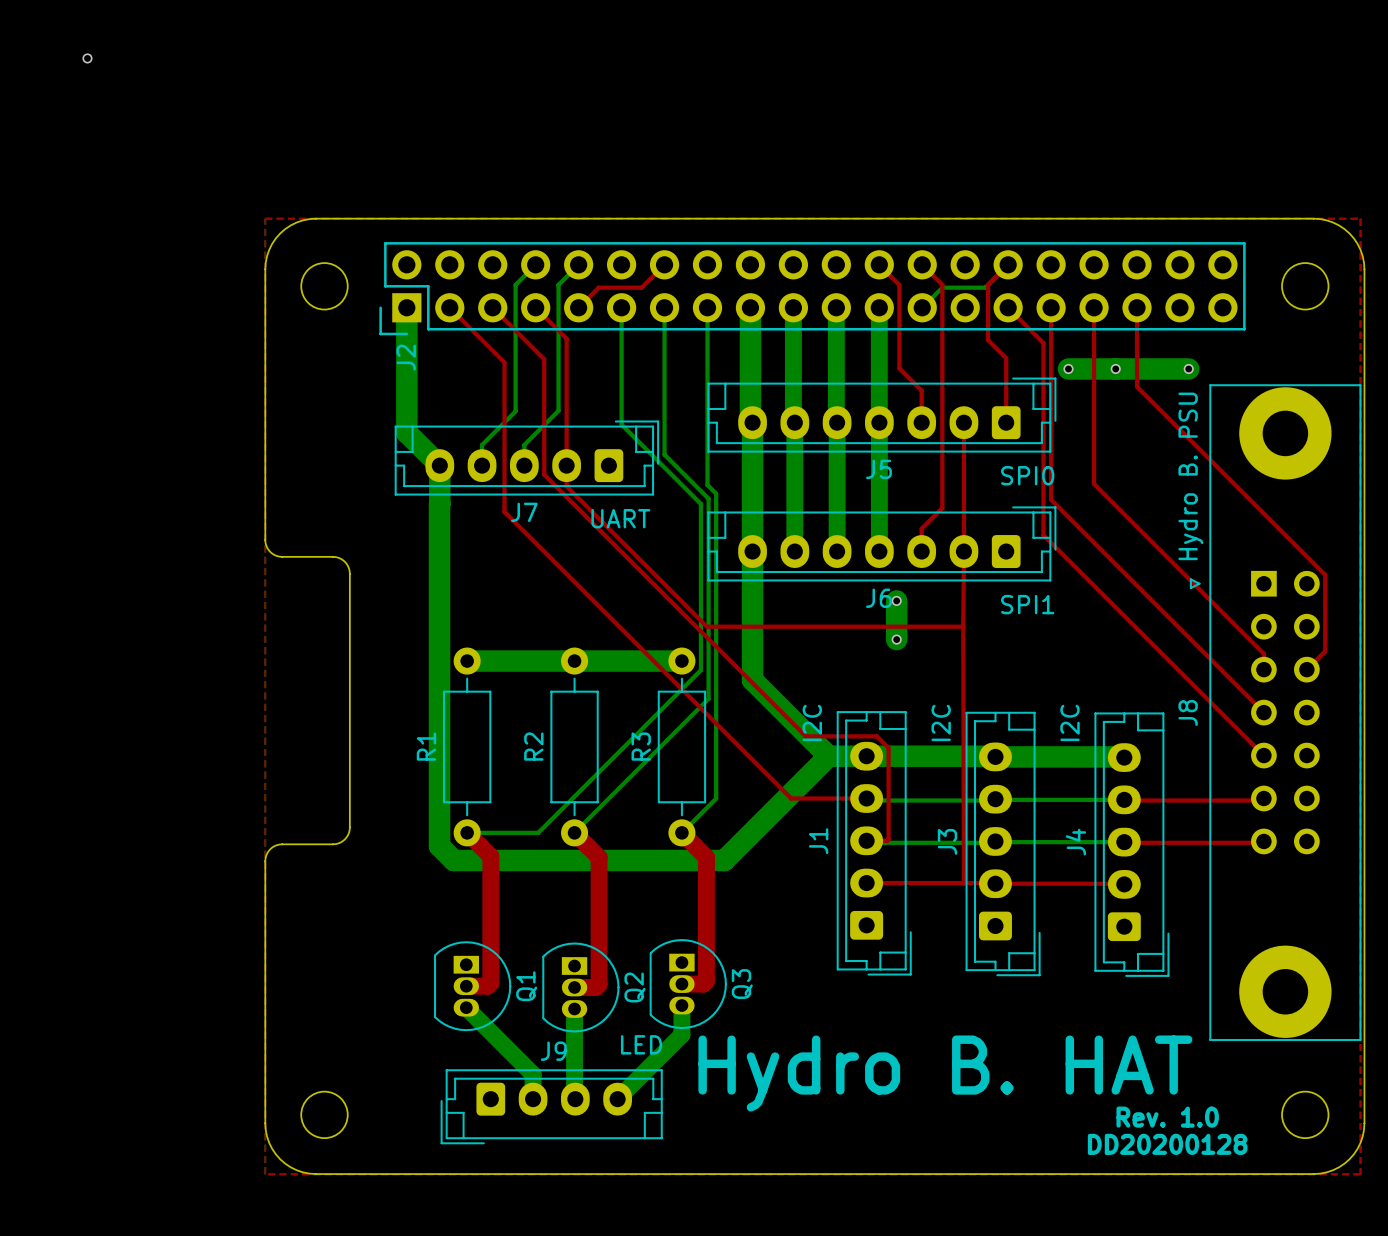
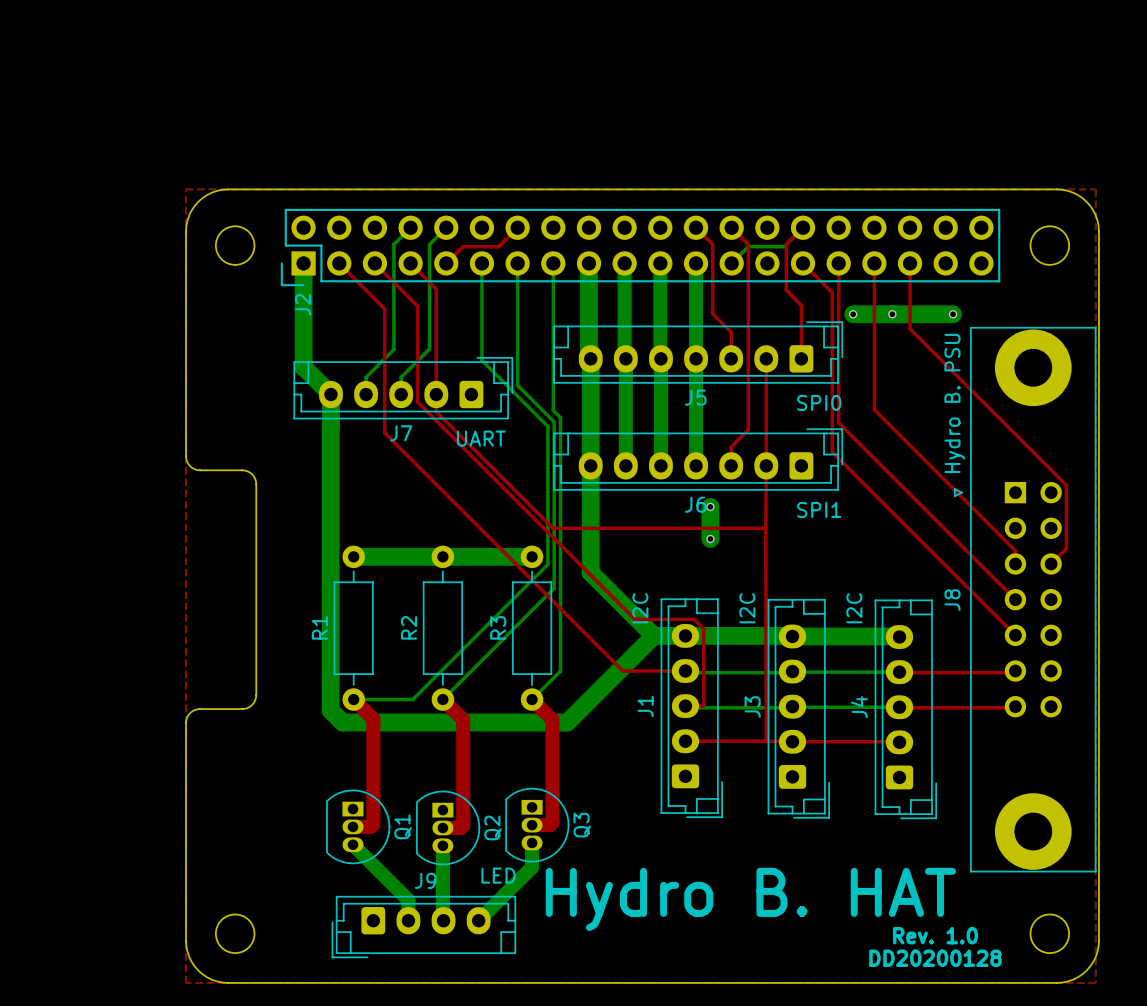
via: (87, 58) -> none

